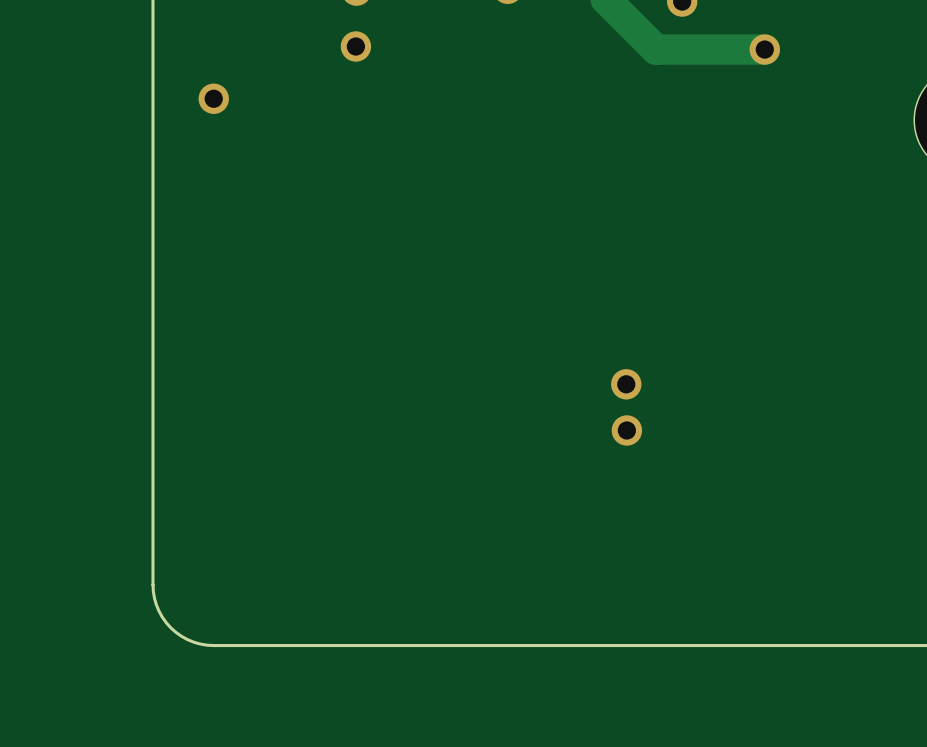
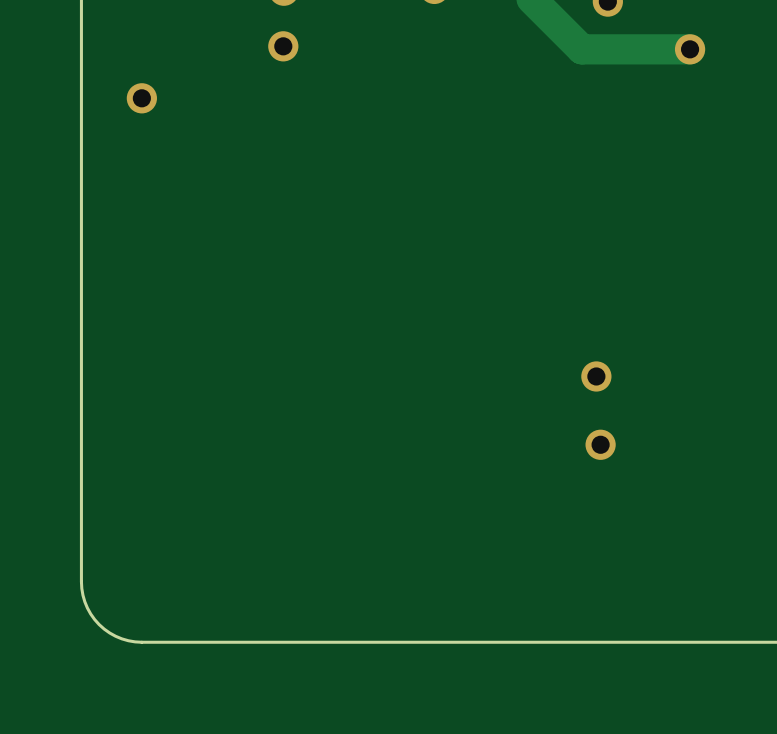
via: none -> (596, 376)
via: (626, 384) -> none
via: (626, 430) -> none
via: none -> (600, 444)

